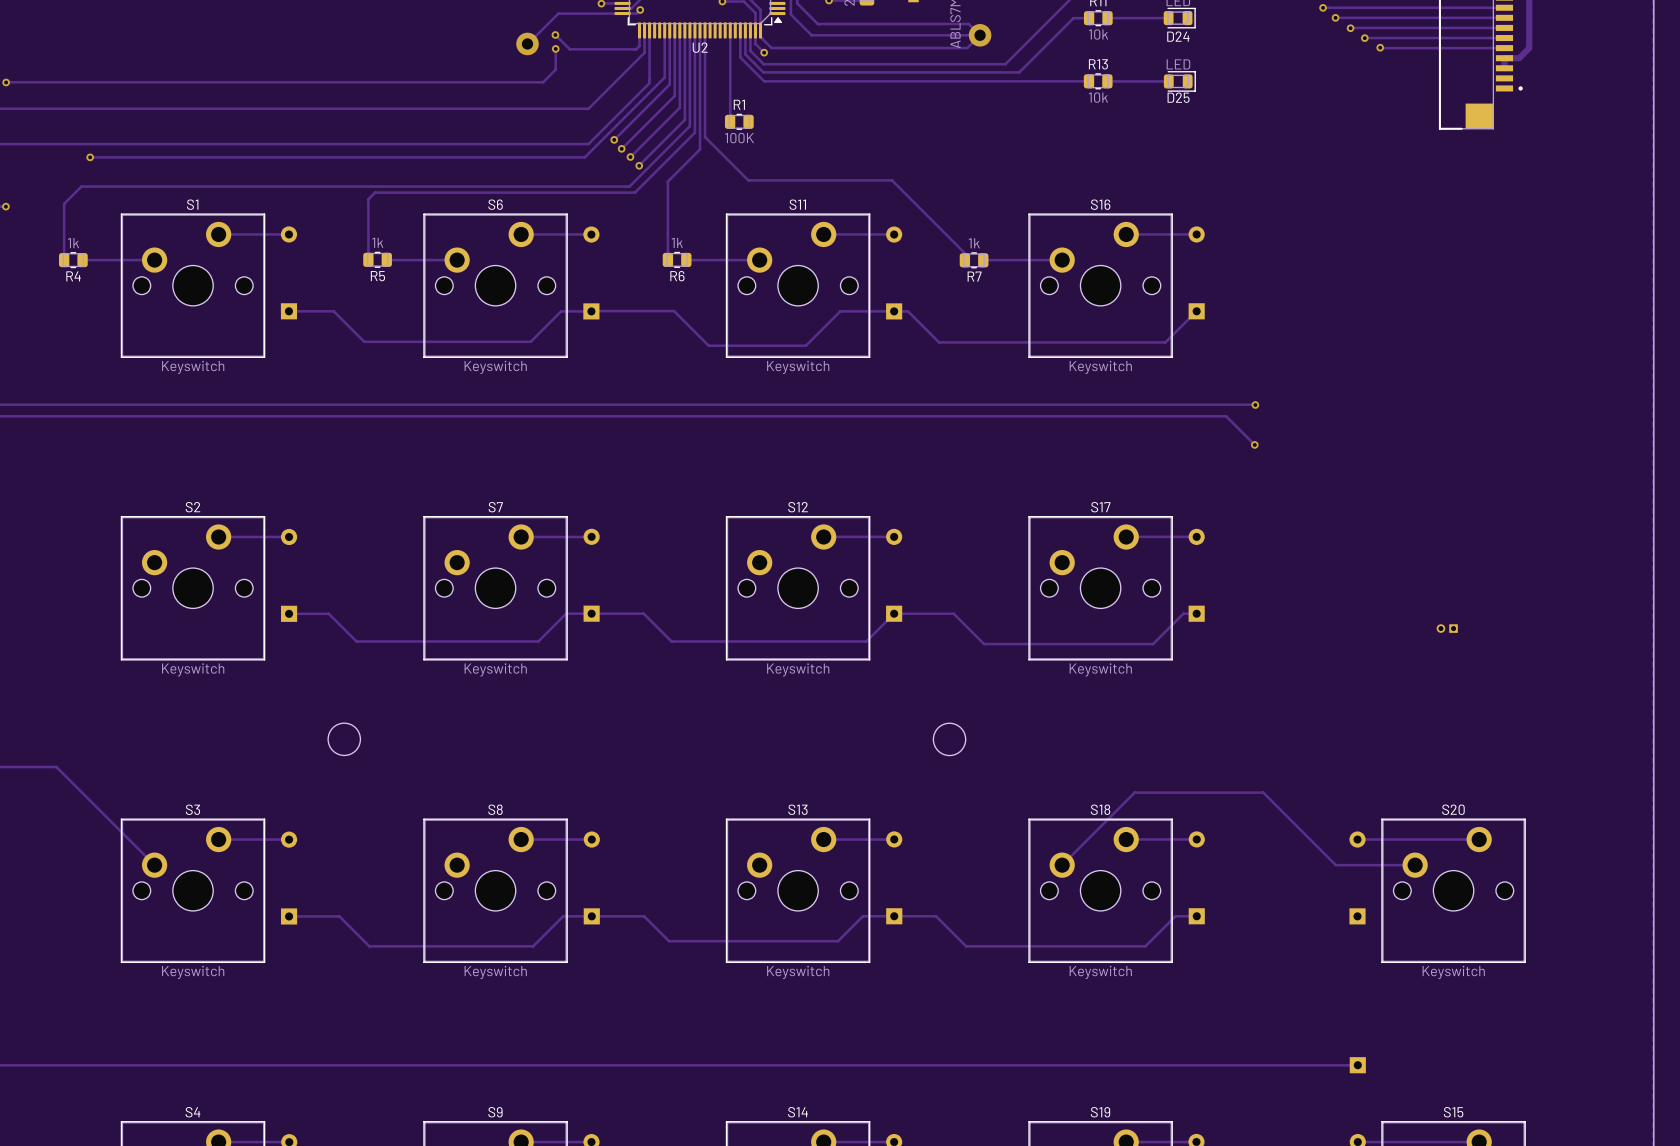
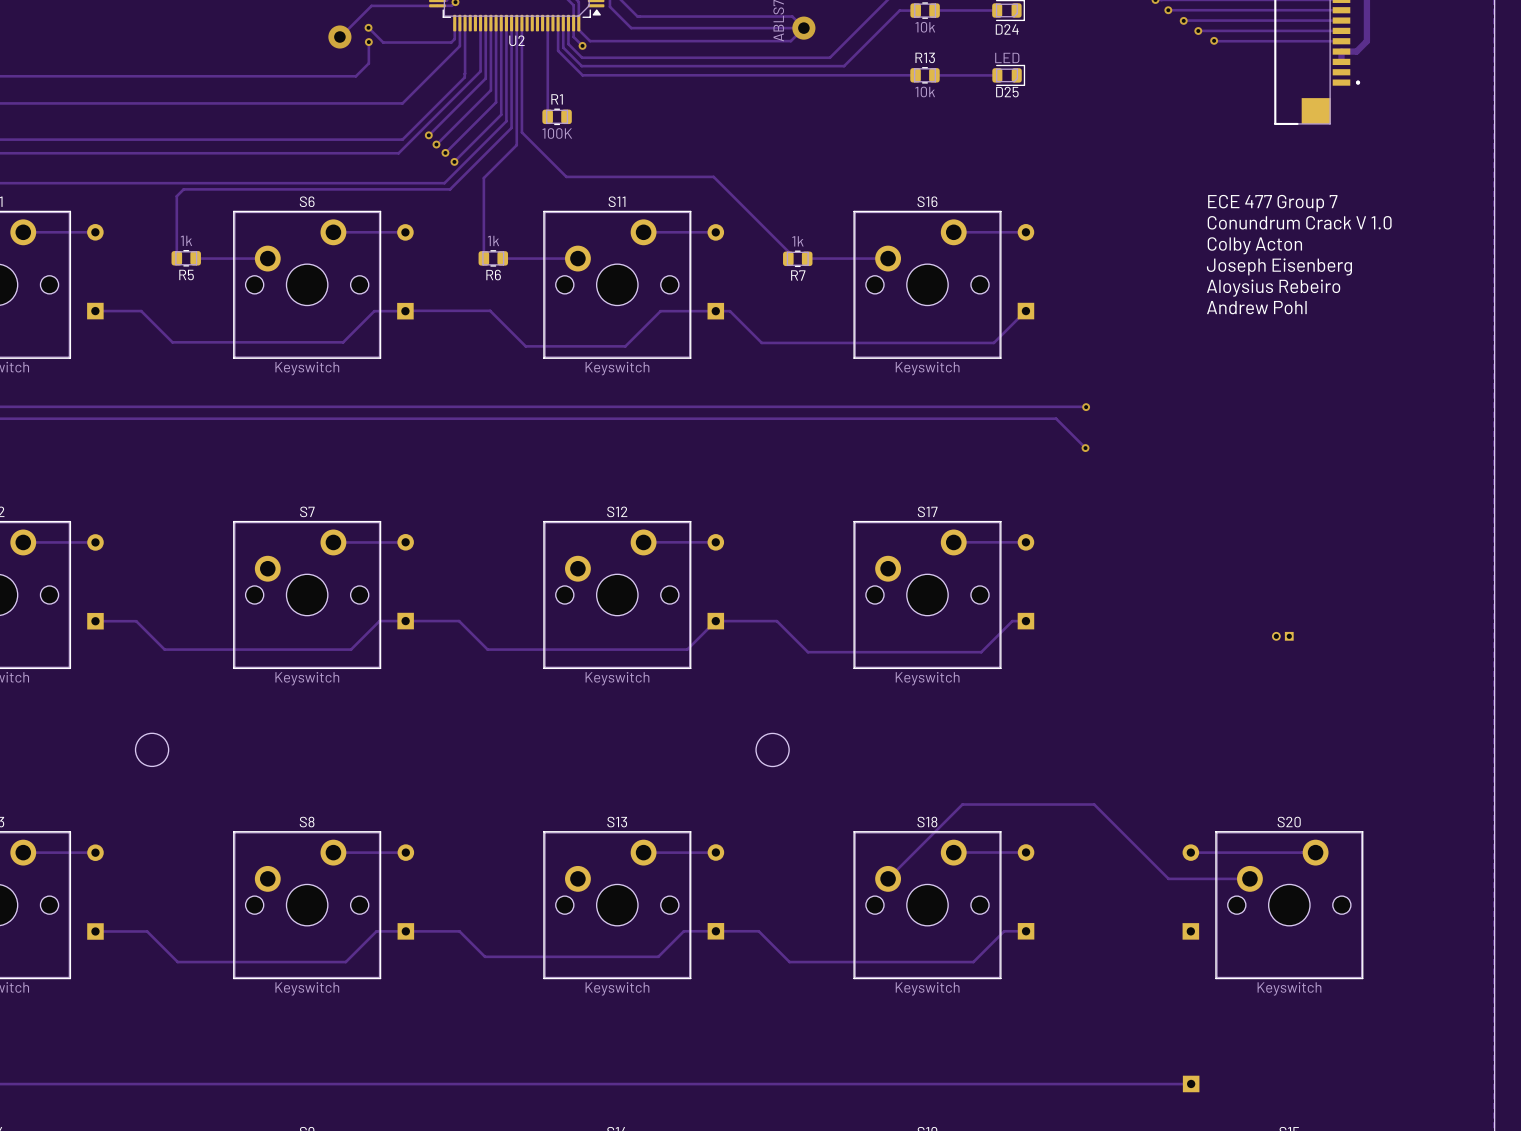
text: none -> ECE 477 Group 7 (1272, 203)
text: none -> Conundrum Crack V 1.0 (1299, 222)
text: none -> Colby Acton (1254, 245)
text: none -> Joseph Eisenberg (1279, 266)
text: none -> Aloysius Rebeiro (1273, 288)
text: none -> Andrew Pohl (1256, 307)

